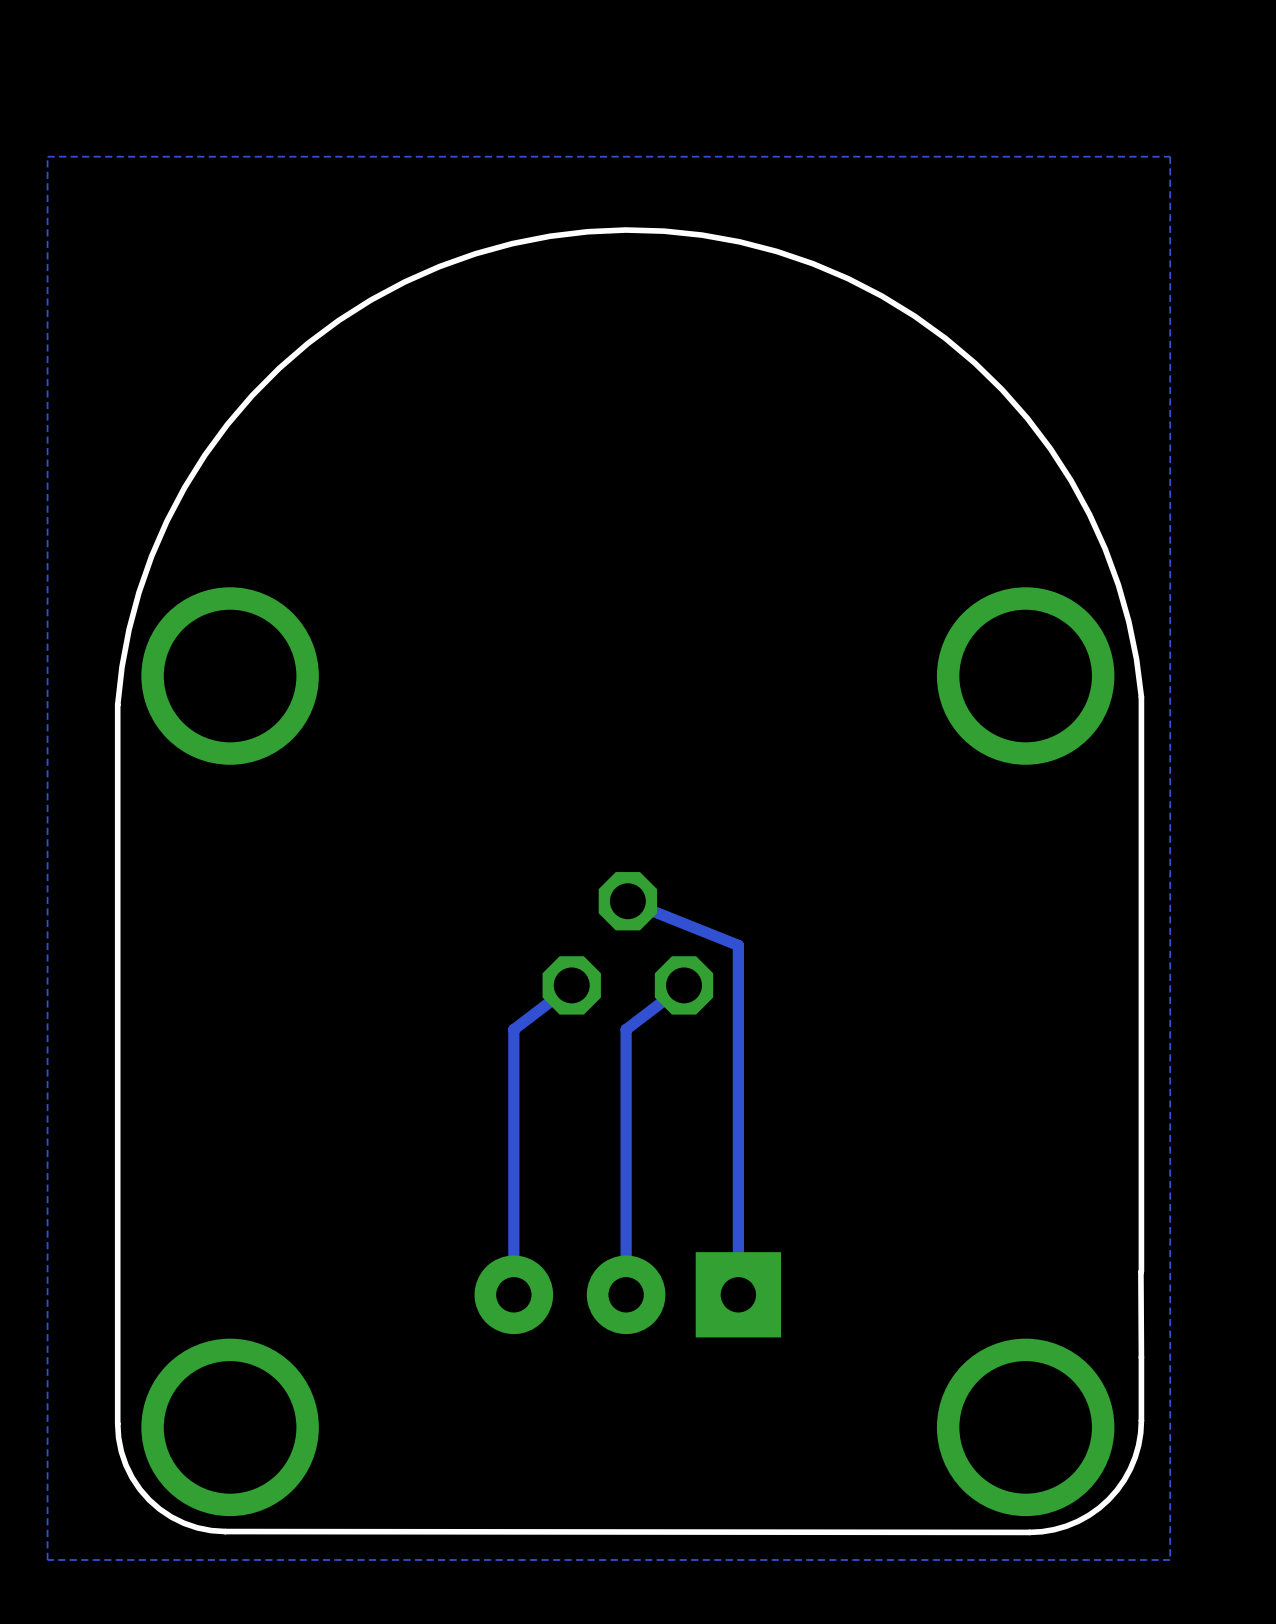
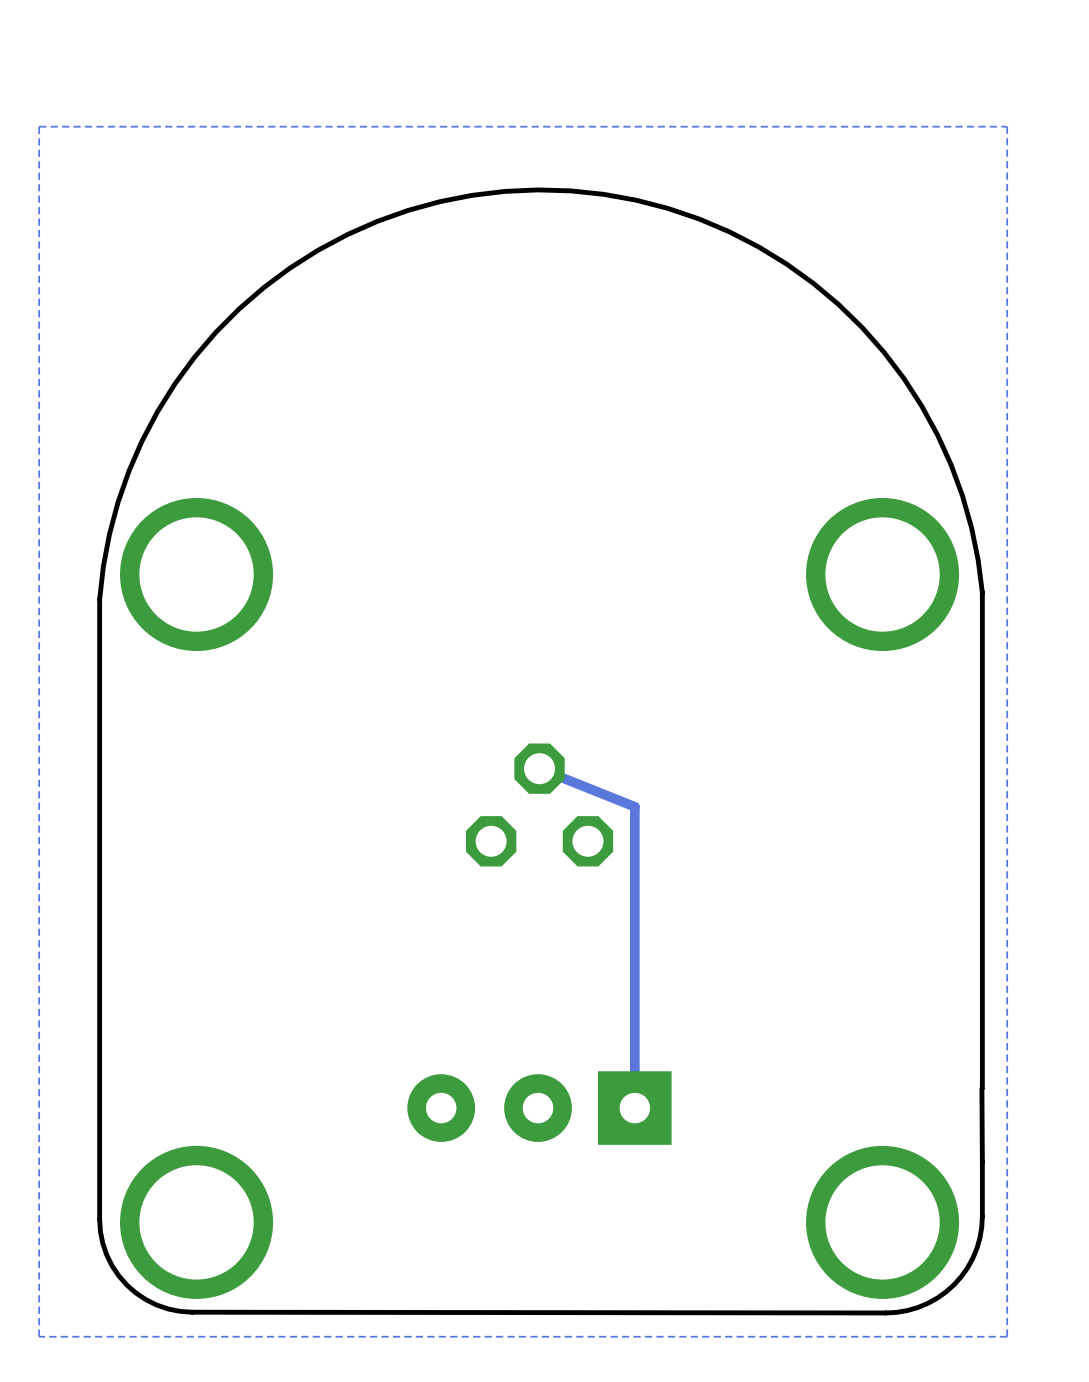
bottom track: (571, 985) (513, 1029) (513, 1294) -> none
bottom track: (684, 985) (626, 1029) (626, 1294) -> none

